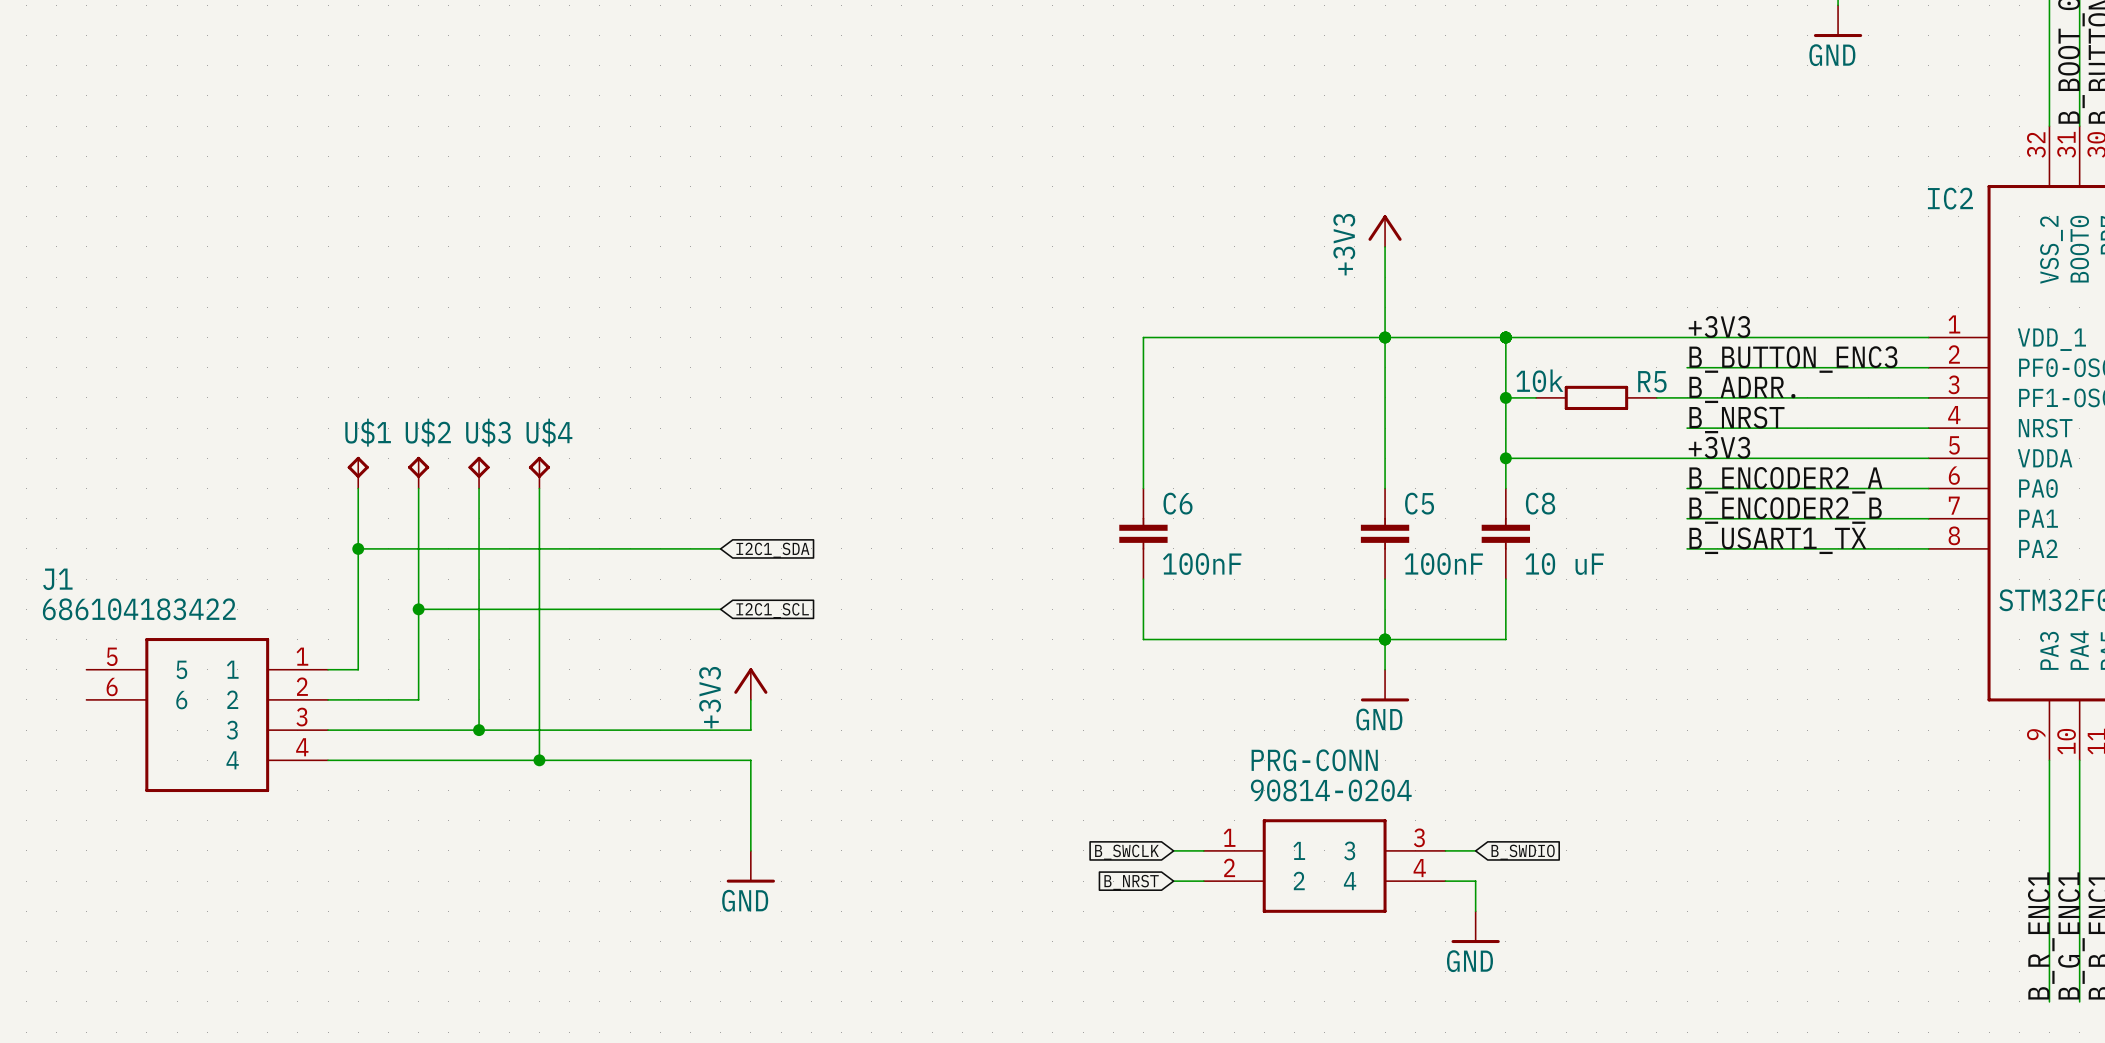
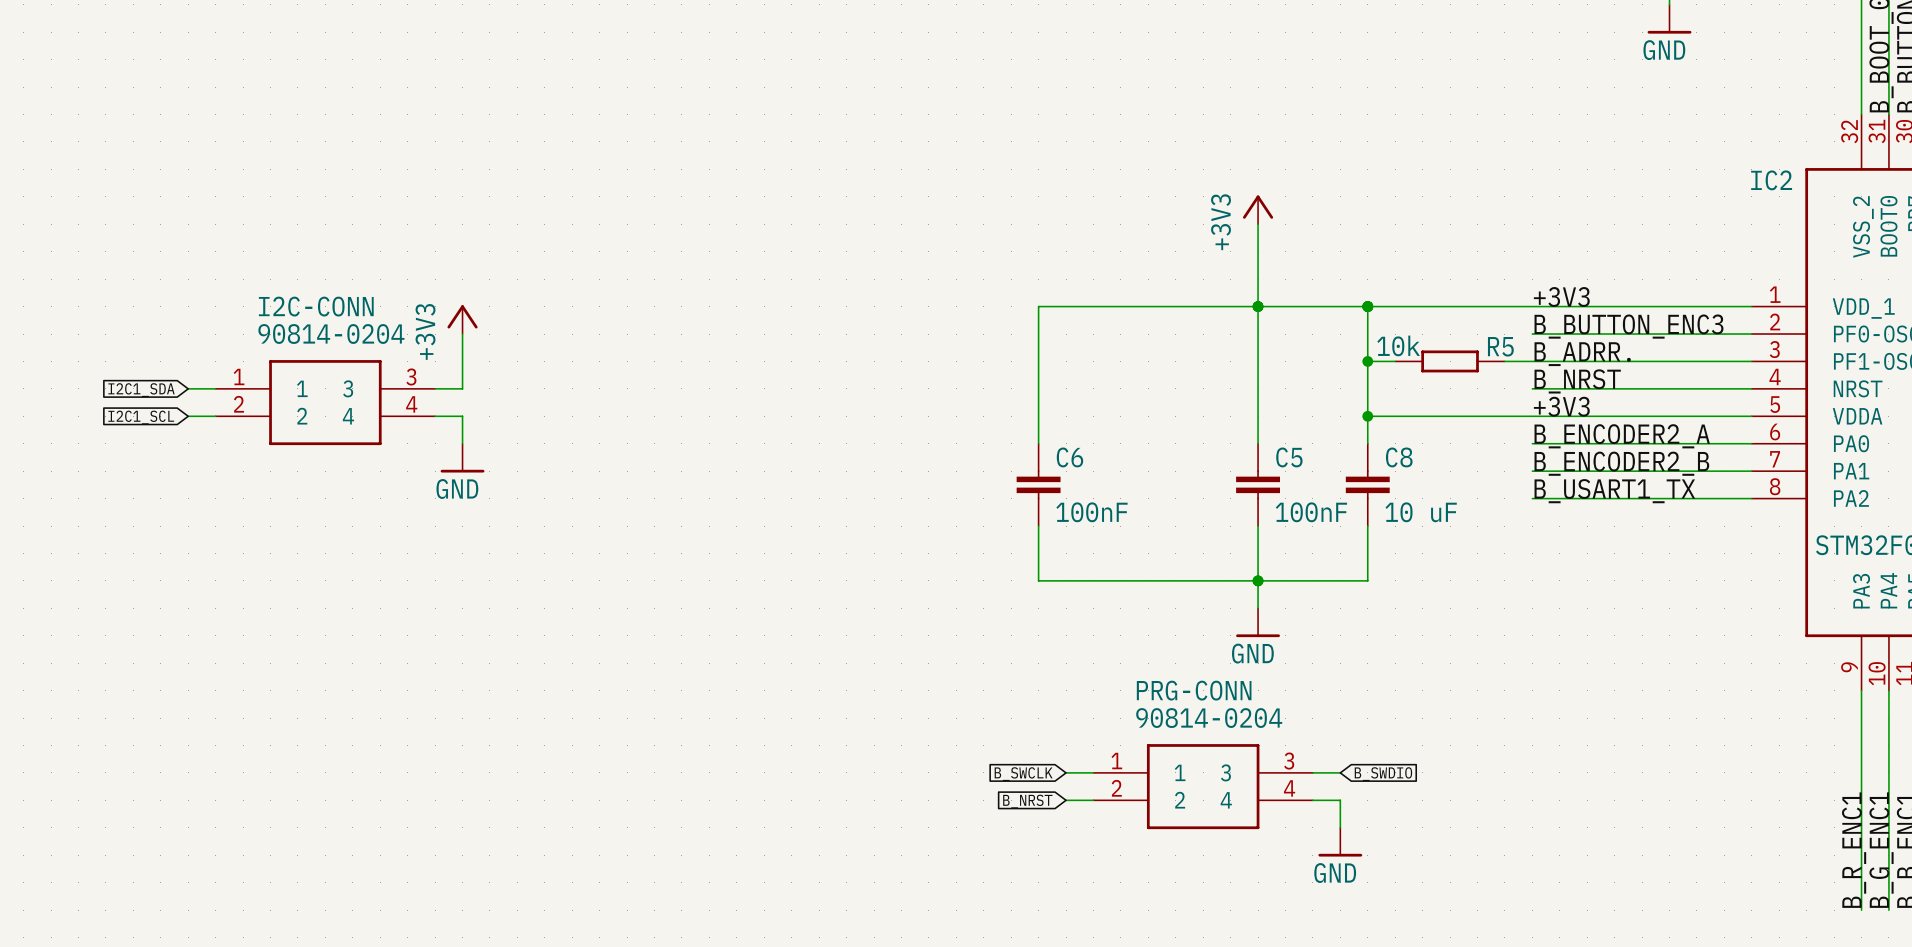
power symbol: none -> +3V3 (462, 319)
wire: none -> (462, 334) (462, 388) (435, 388)
wire: none -> (188, 388) (215, 388)
global label: none -> I2C1_SDA (141, 390)
I2C-CONN: none -> 90814-0204 (325, 402)
wire: none -> (188, 416) (215, 416)
wire: none -> (435, 416) (462, 416) (462, 443)
global label: none -> I2C1_SCL (141, 417)
U$1: (358, 472) -> none
U$2: (418, 472) -> none
U$3: (479, 472) -> none
U$4: (539, 472) -> none
wire: (358, 488) (358, 669) (328, 669) -> none
wire: (418, 488) (418, 699) (328, 699) -> none
wire: (479, 488) (479, 730) -> none
wire: (539, 488) (539, 760) -> none
power symbol: none -> GND (462, 458)
wire: (358, 548) (720, 548) -> none
junction: (358, 548) -> none
global label: I2C1_SDA (772, 550) -> none
wire: (418, 609) (720, 609) -> none
junction: (418, 609) -> none
global label: I2C1_SCL (772, 610) -> none
power symbol: +3V3 (750, 684) -> none
wire: (750, 699) (750, 730) (328, 730) -> none
J1: 686104183422 (207, 715) -> none
junction: (479, 730) -> none
wire: (328, 760) (750, 760) (750, 850) -> none
junction: (539, 760) -> none
power symbol: GND (750, 866) -> none

